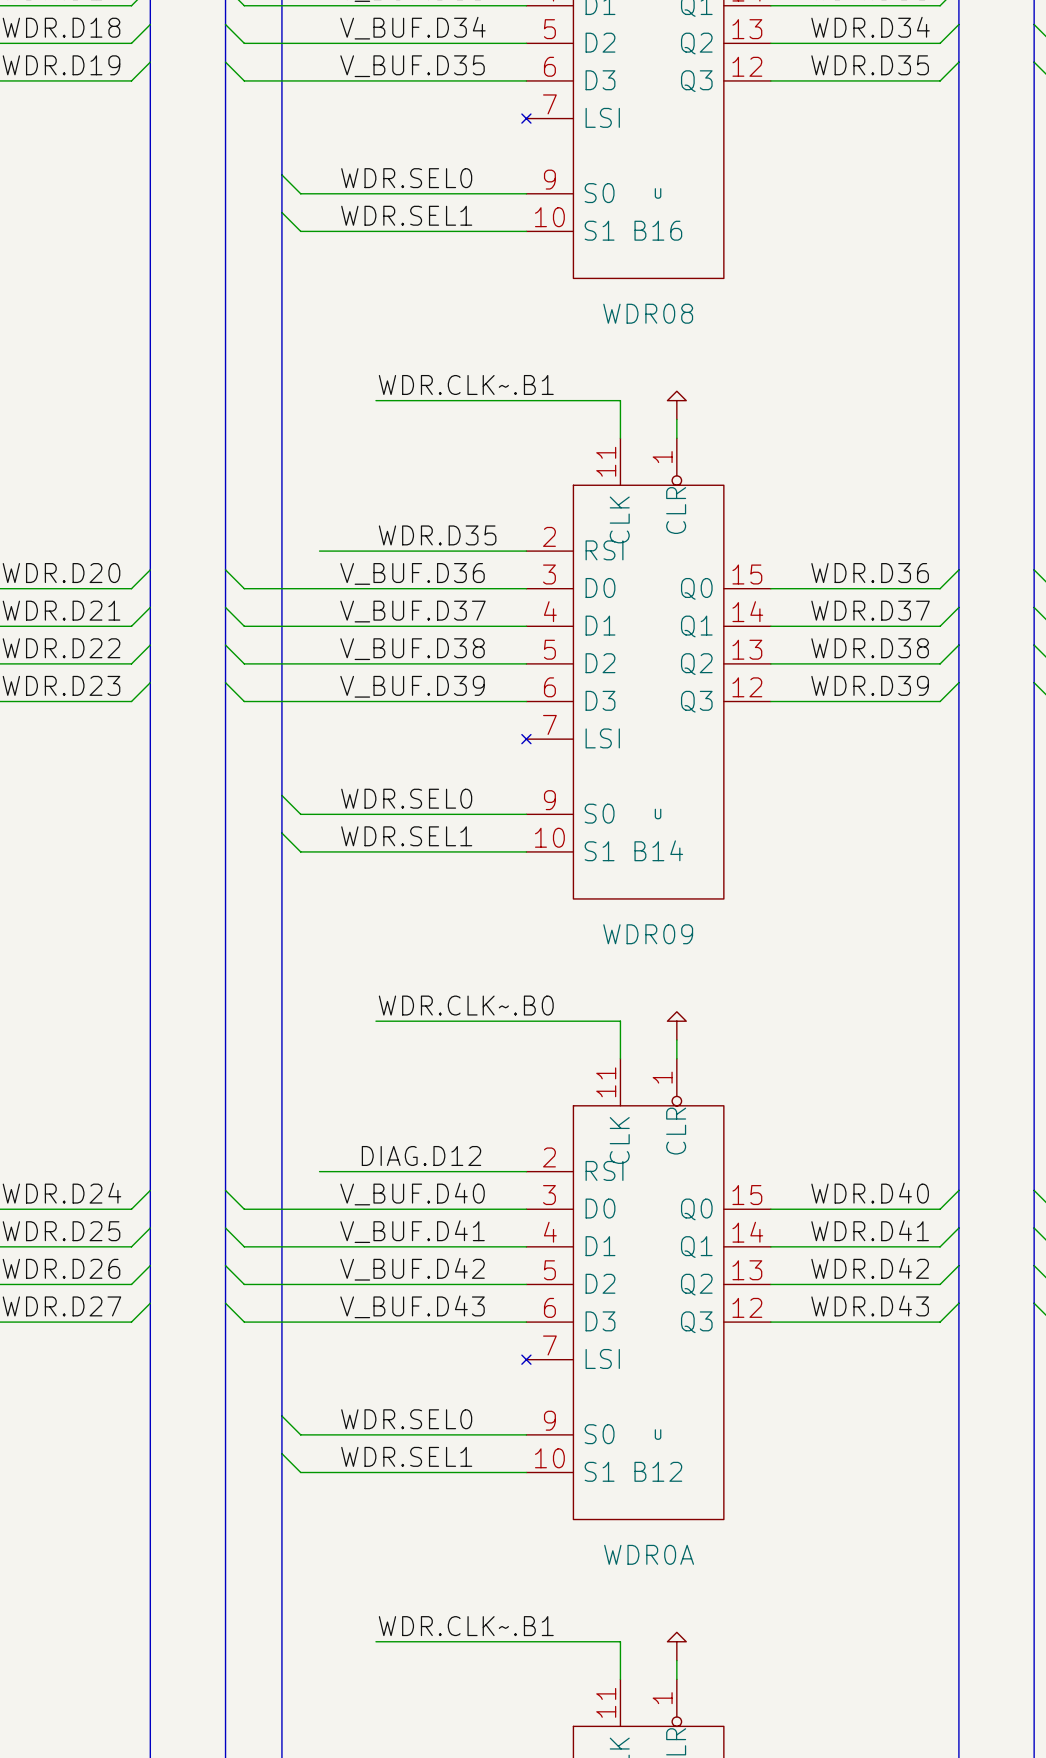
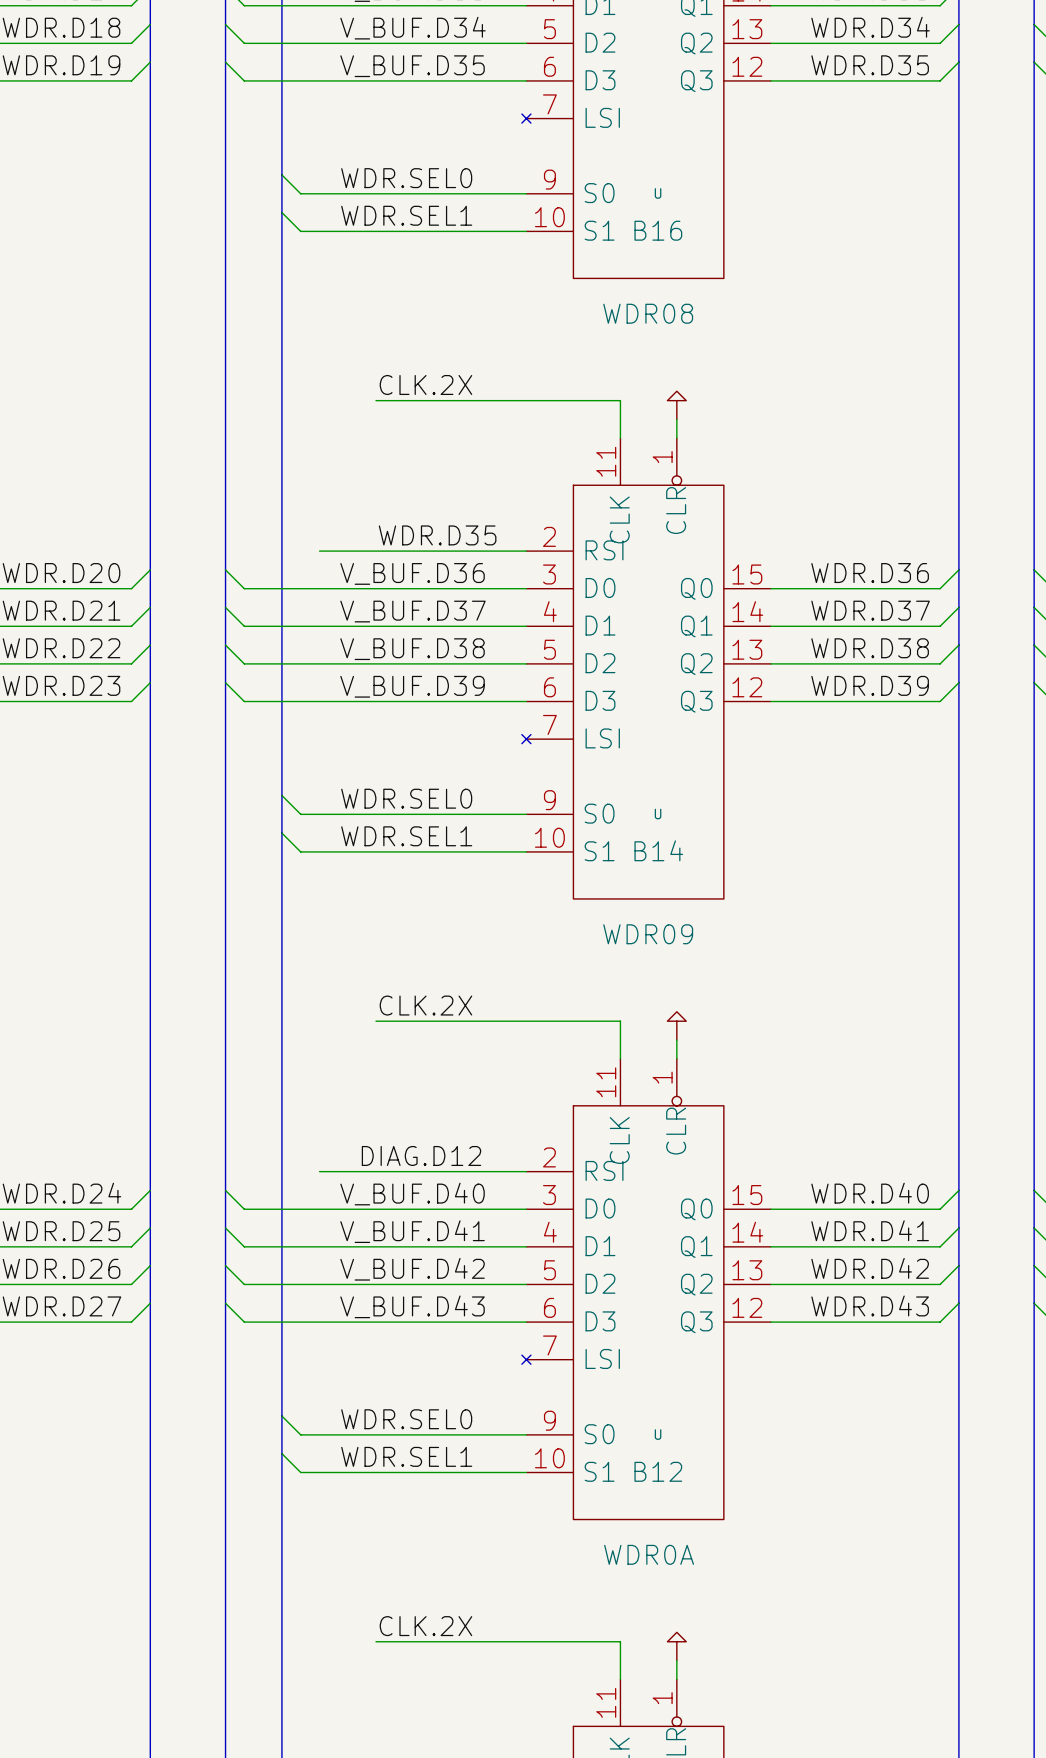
label: WDR.CLK~.B1 (466, 384) -> CLK.2X (425, 384)
label: WDR.CLK~.B0 (466, 1005) -> CLK.2X (425, 1005)
label: WDR.CLK~.B1 (466, 1626) -> CLK.2X (425, 1626)

